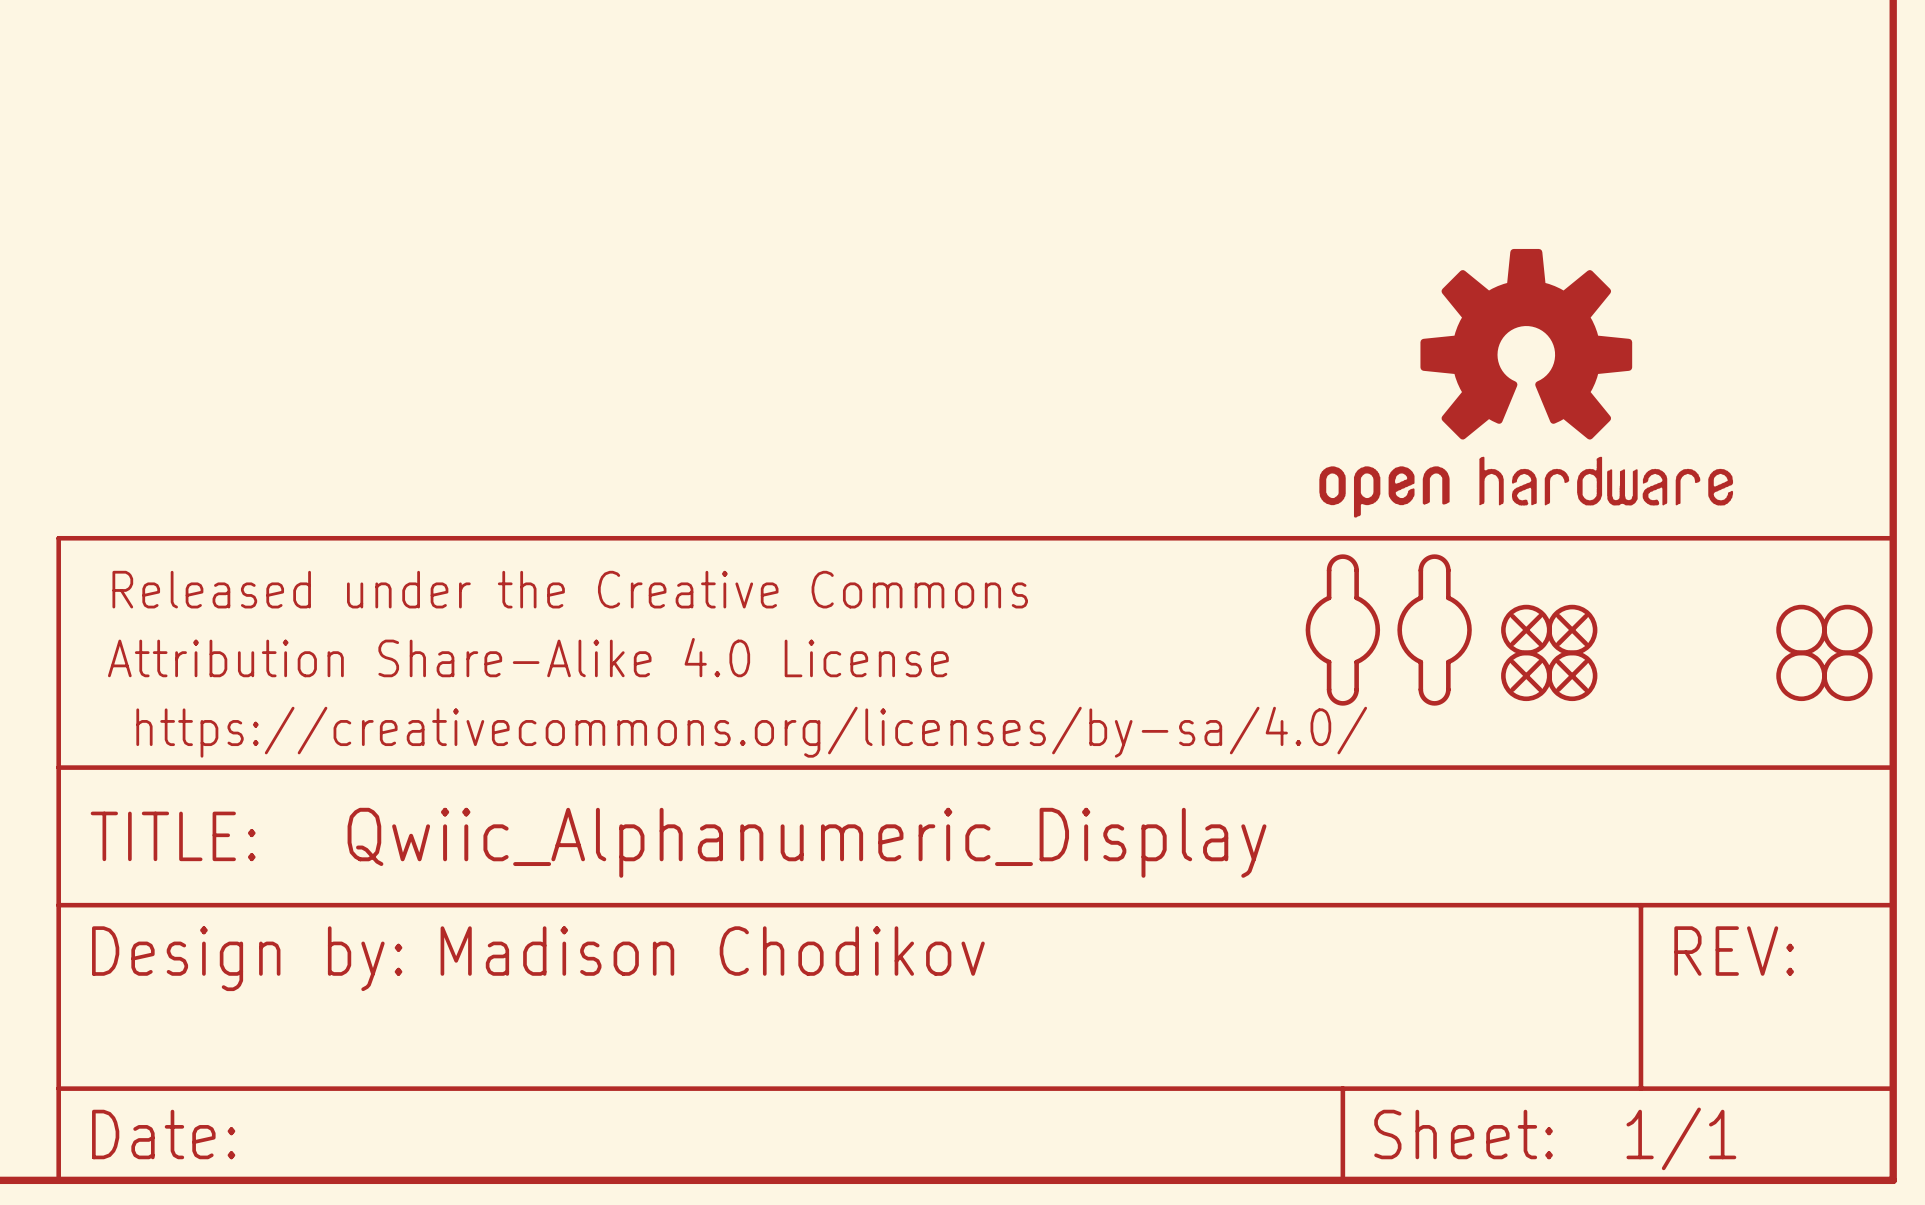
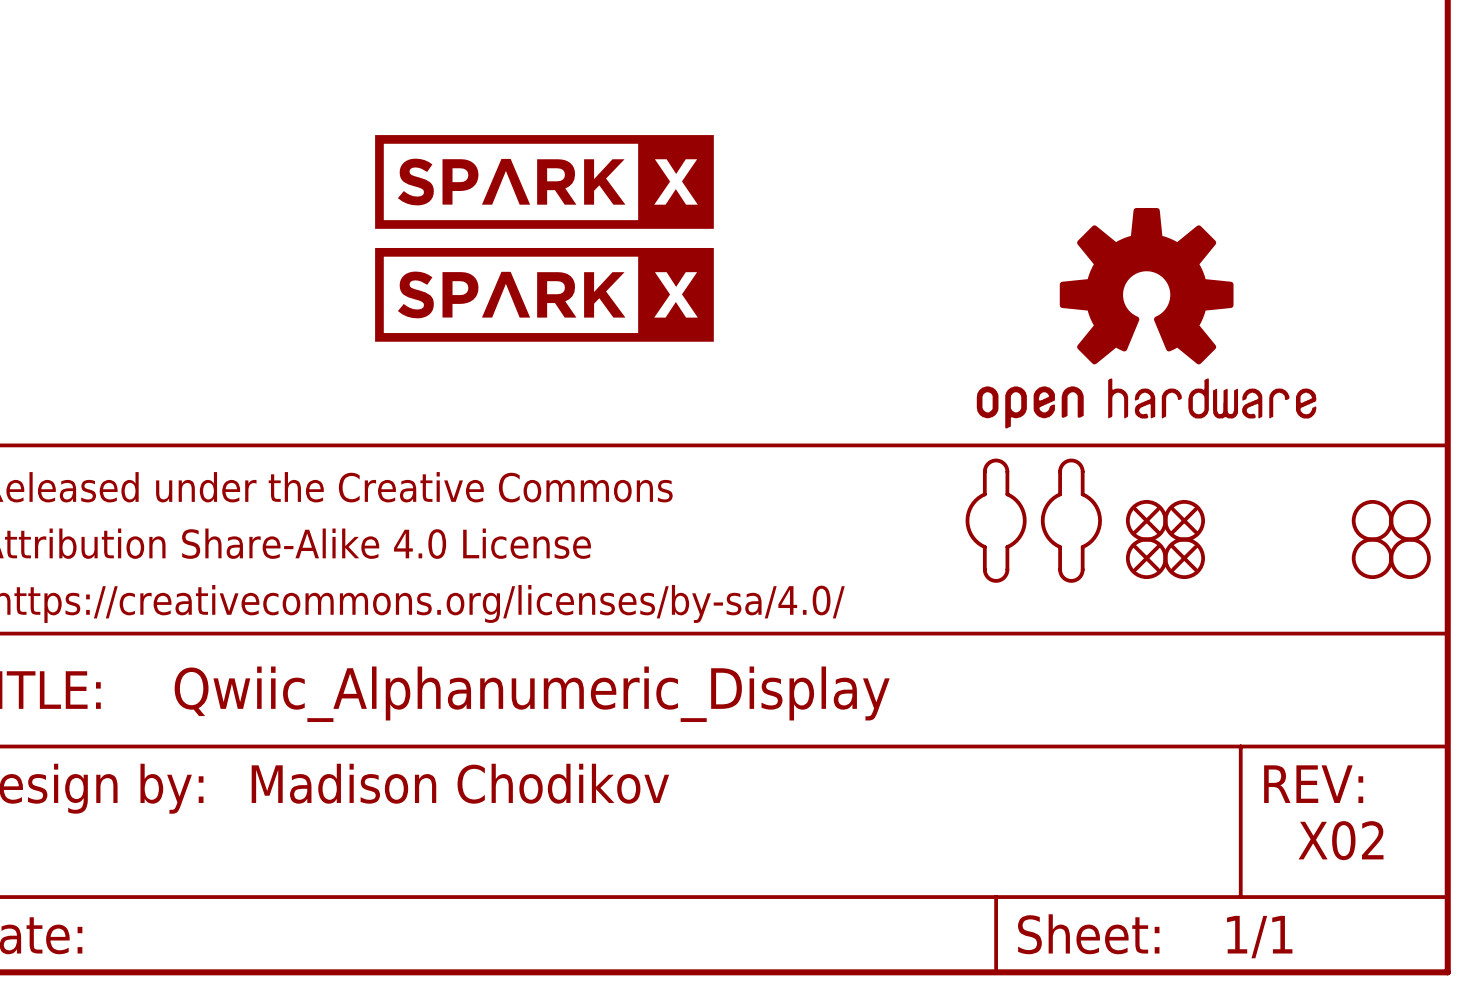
part: none -> (544, 181)
part: none -> (544, 294)
text: none -> X02 (1341, 840)

